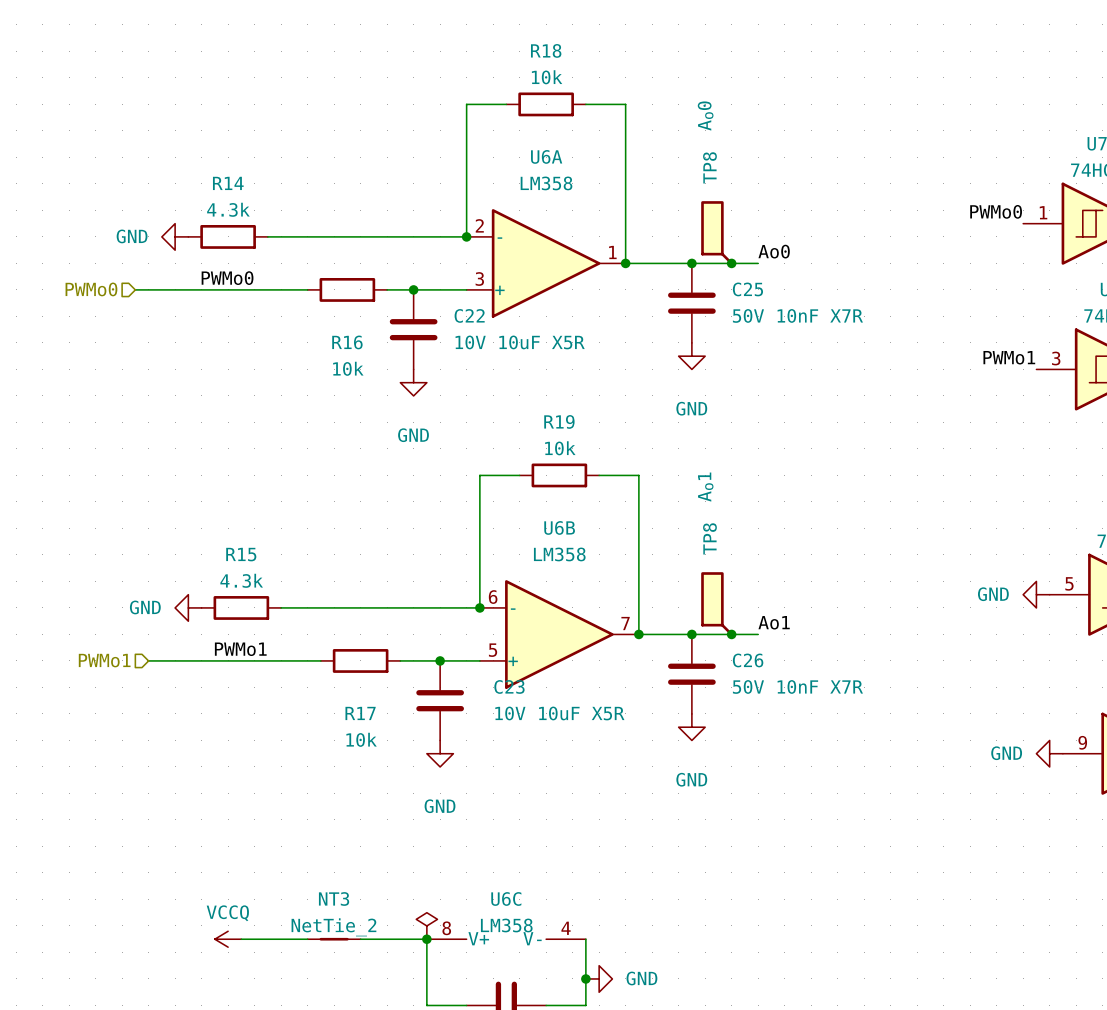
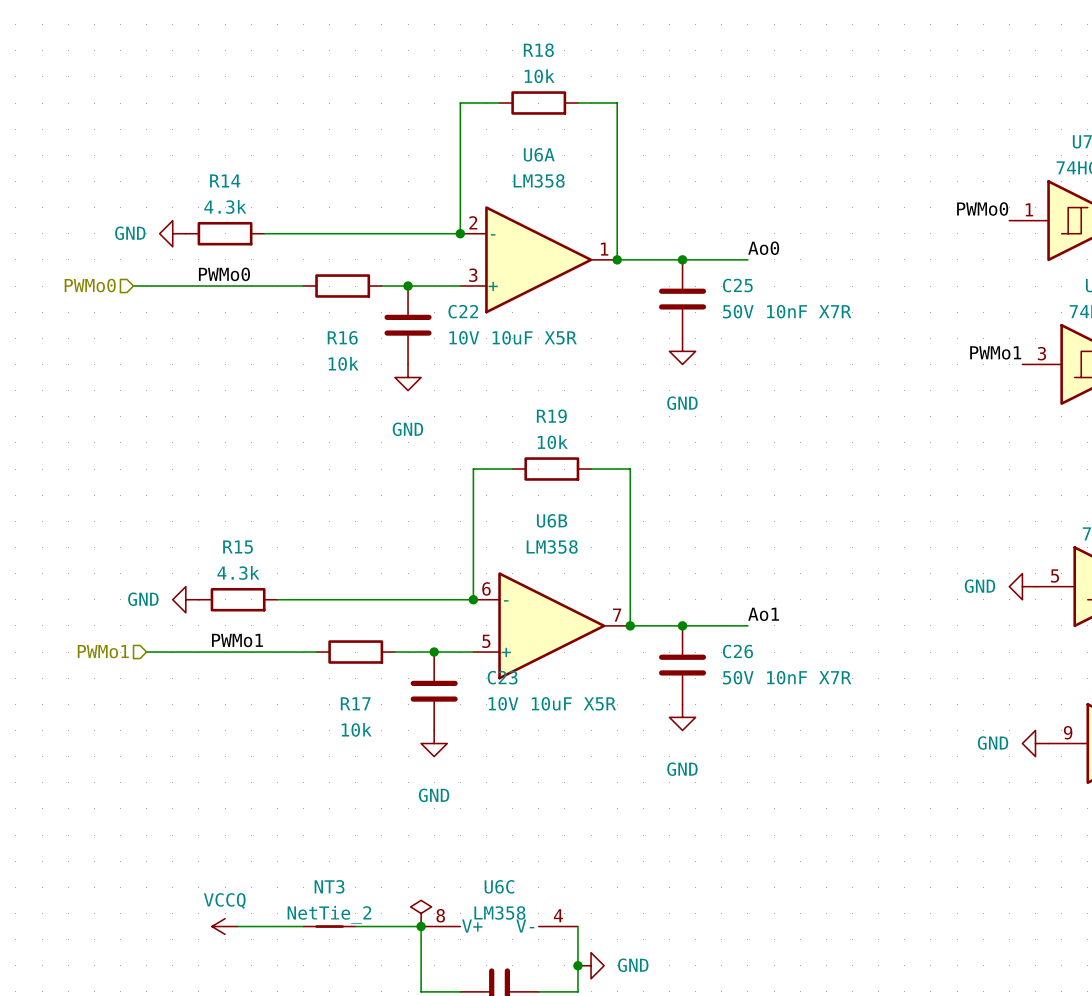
TP8: Ao0 (717, 232) -> none
junction: (731, 263) -> none
TP8: Ao1 (717, 603) -> none
junction: (731, 634) -> none

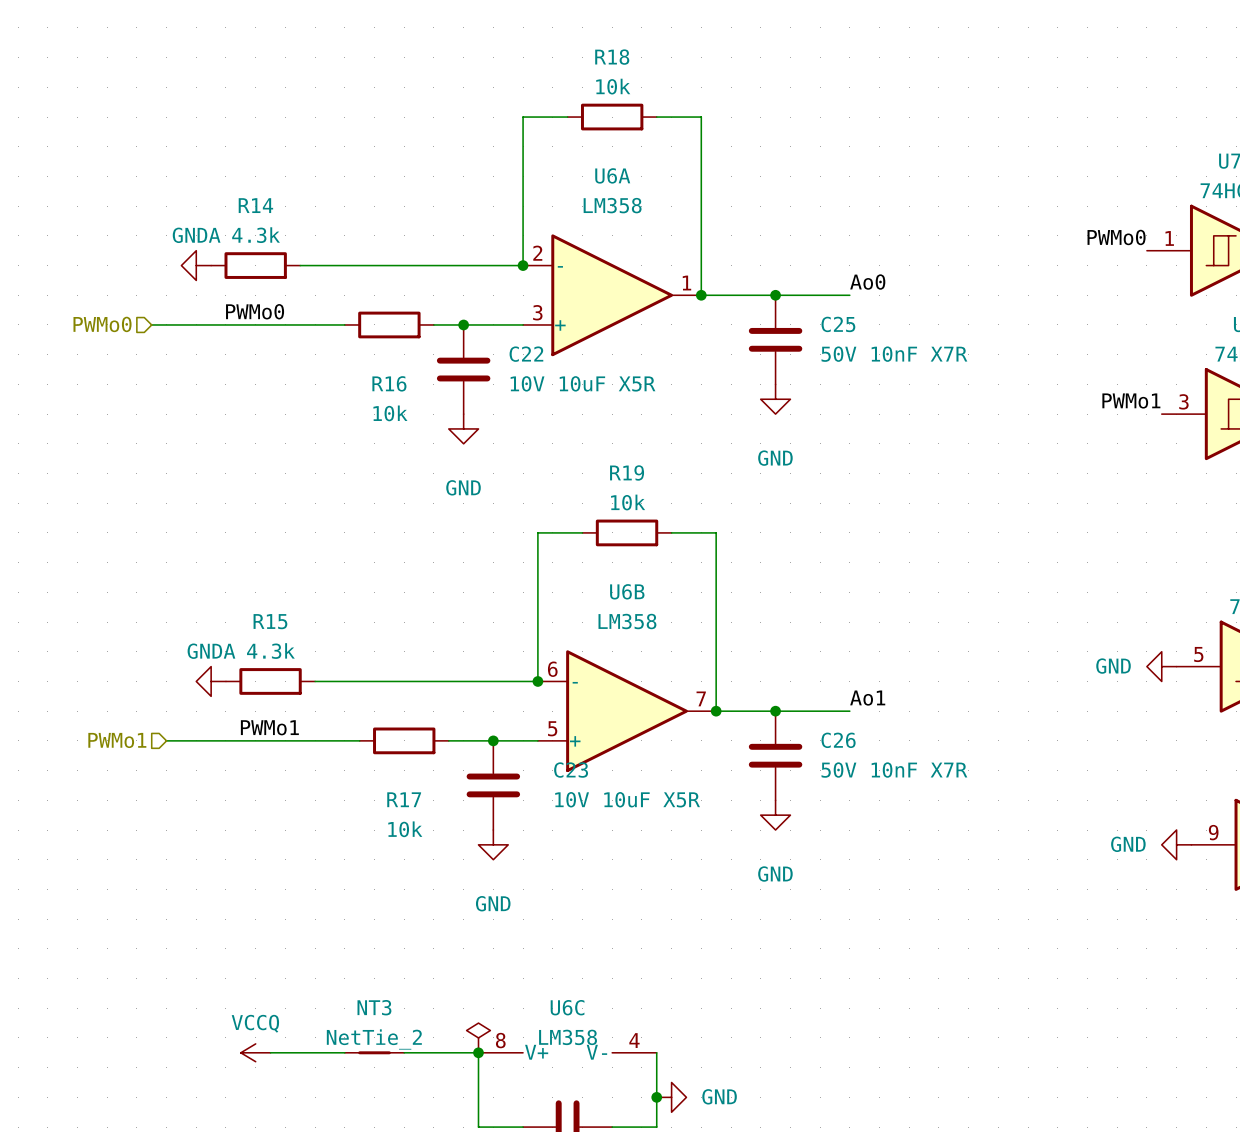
power symbol: GND (172, 233) -> GNDA (196, 265)
power symbol: GND (185, 599) -> GNDA (211, 681)

